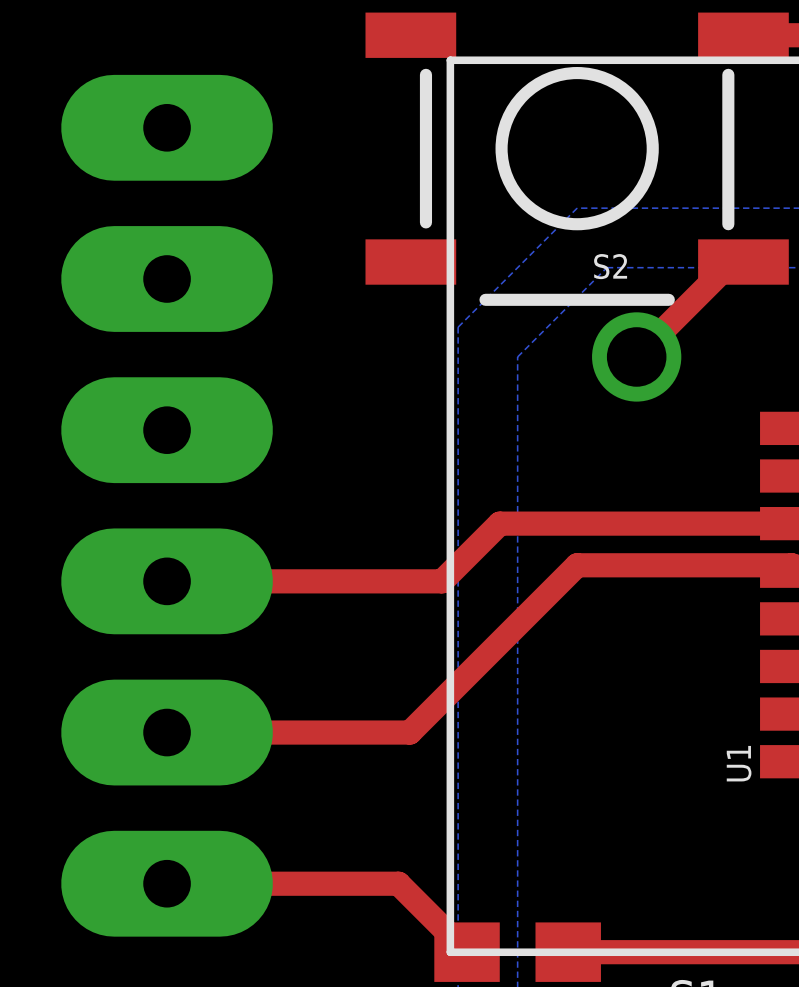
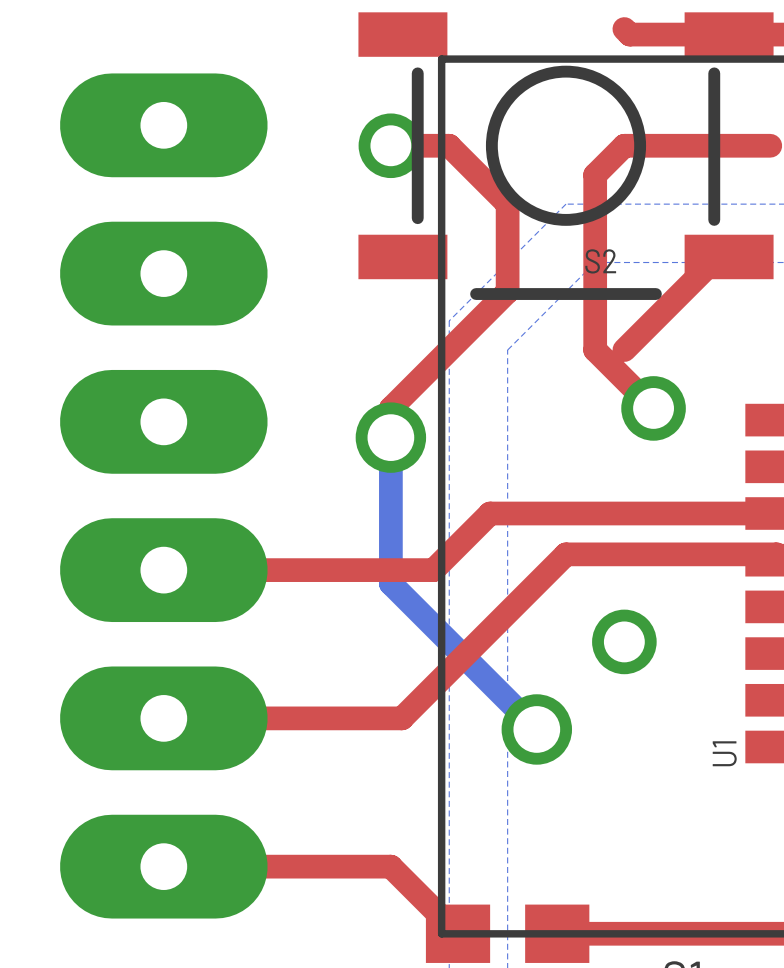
top track: none -> (624, 29) (629, 34) (729, 34)
top track: none -> (390, 145) (449, 145) (507, 204) (507, 291) (390, 408) (390, 437)
via: none -> (390, 145)
top track: none -> (770, 145) (624, 145) (595, 174) (595, 350) (653, 408)
via: (636, 356) -> none
via: none -> (653, 408)
bottom track: none -> (390, 437) (390, 583) (536, 729)
via: none -> (390, 437)
via: none -> (624, 641)
via: none -> (536, 729)

